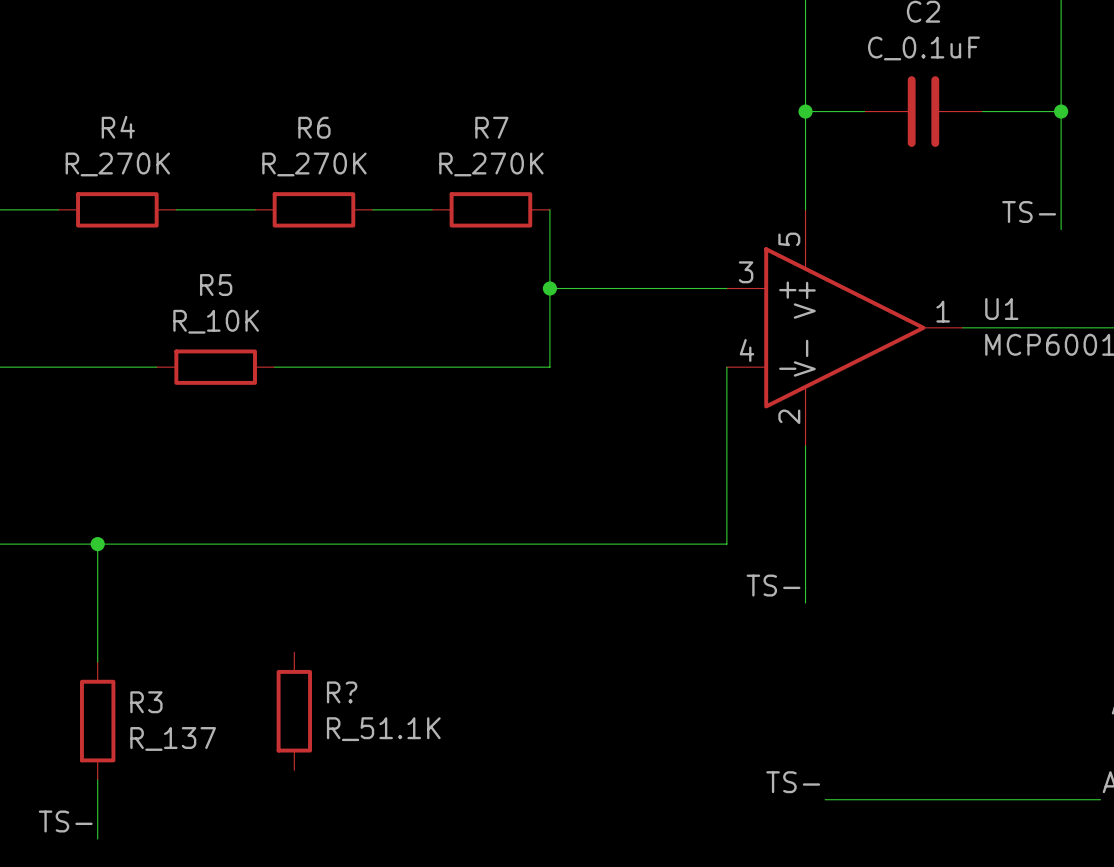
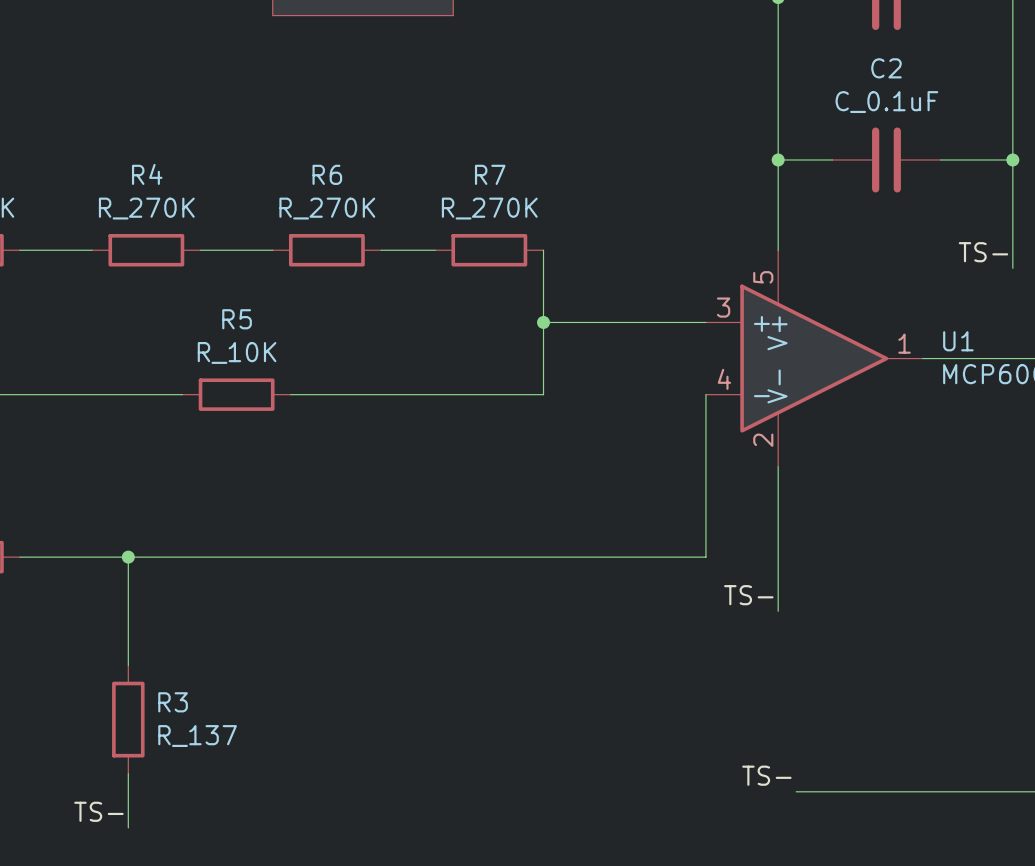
R?: R_51.1K (294, 711) -> none

